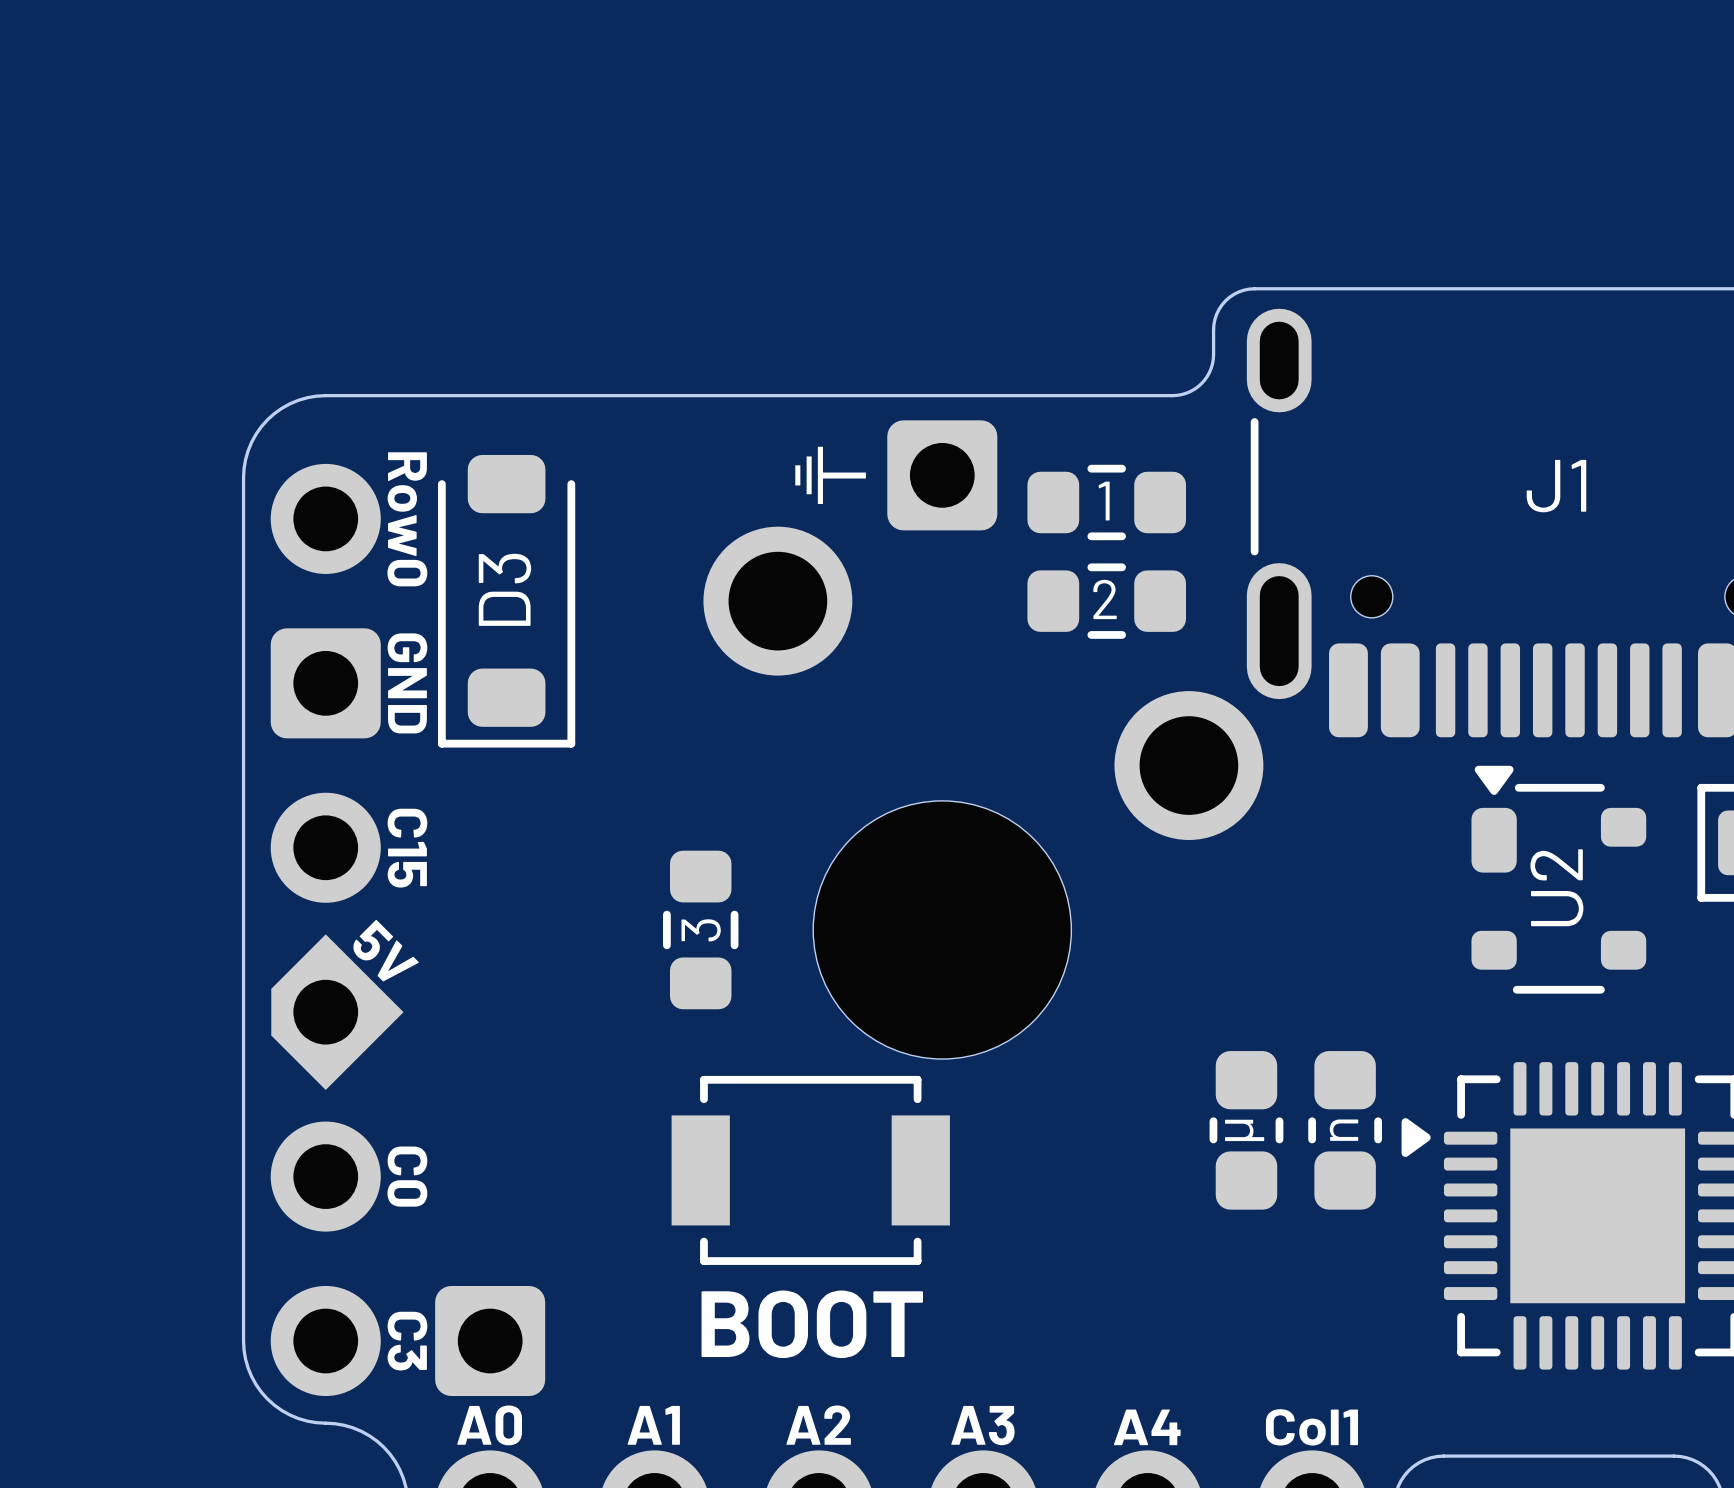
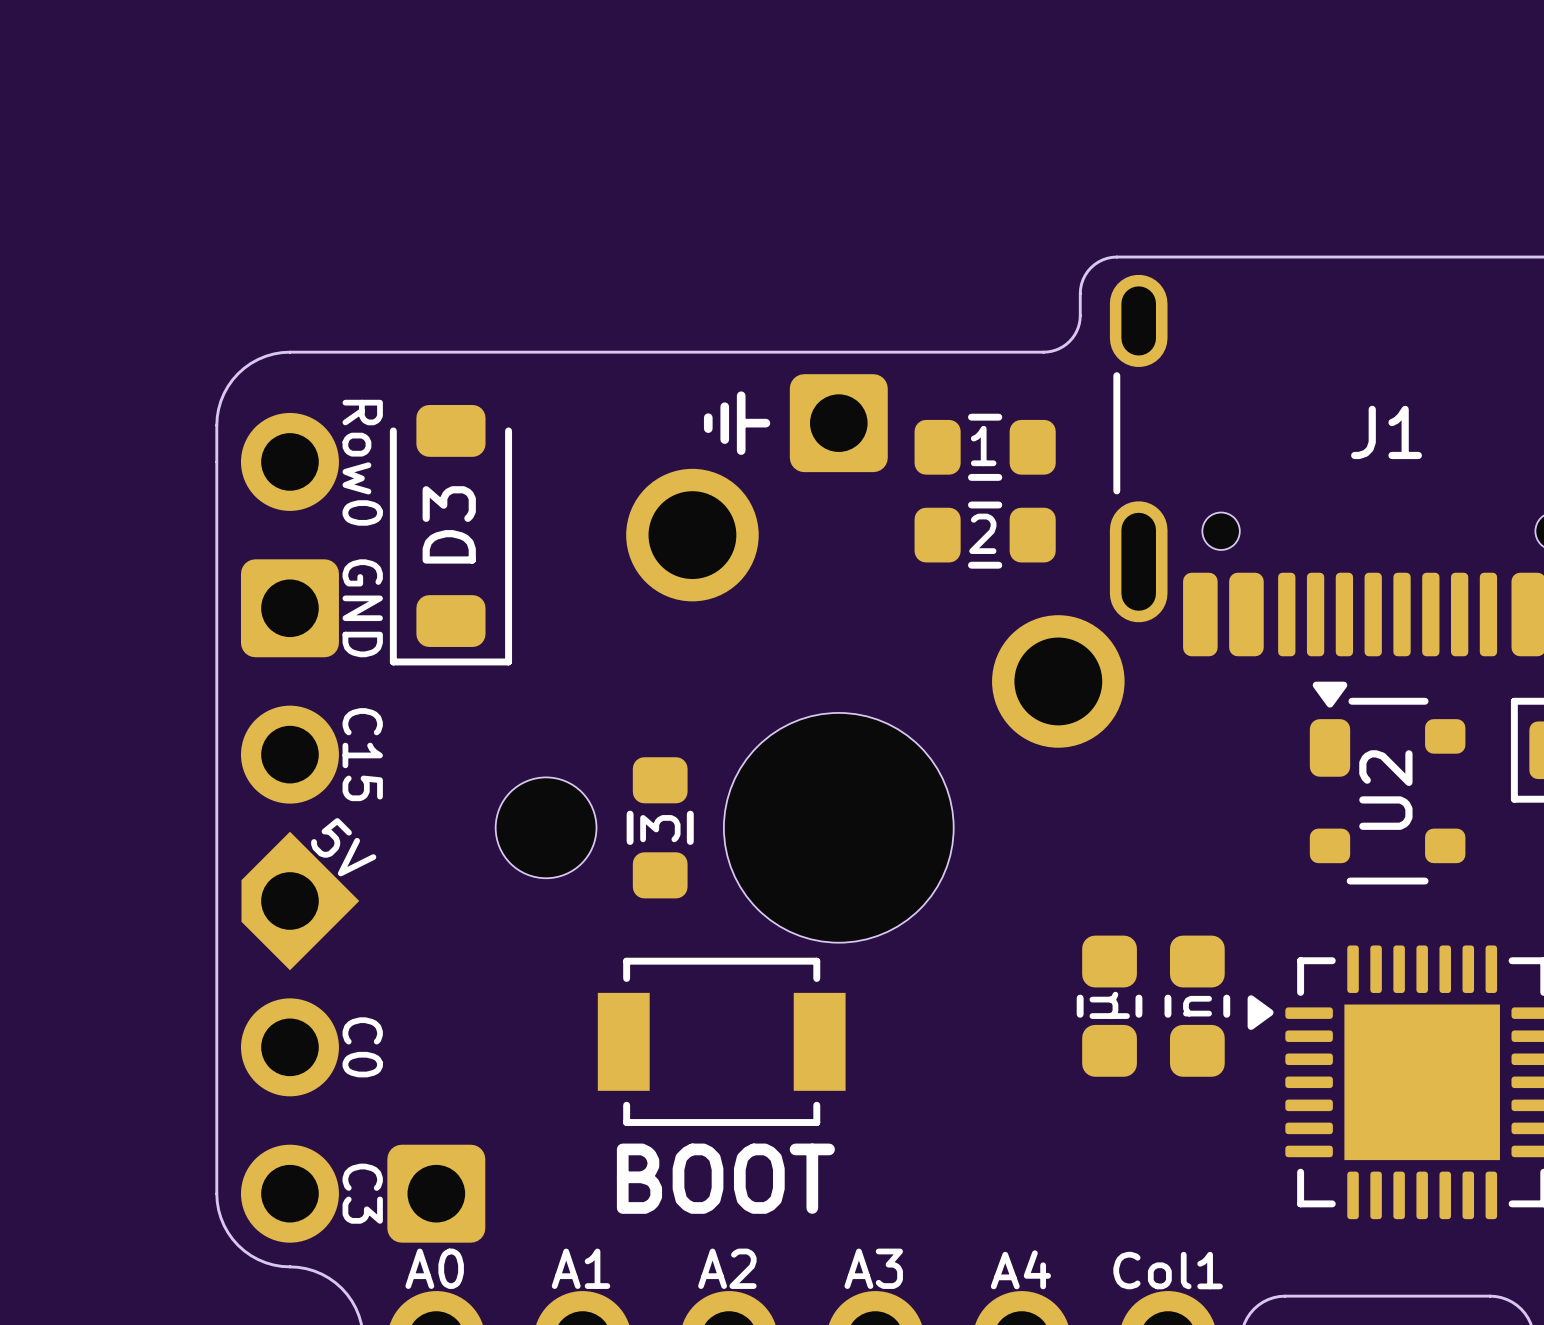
part: none -> (810, 705)
part position: (700, 929) -> (660, 827)

